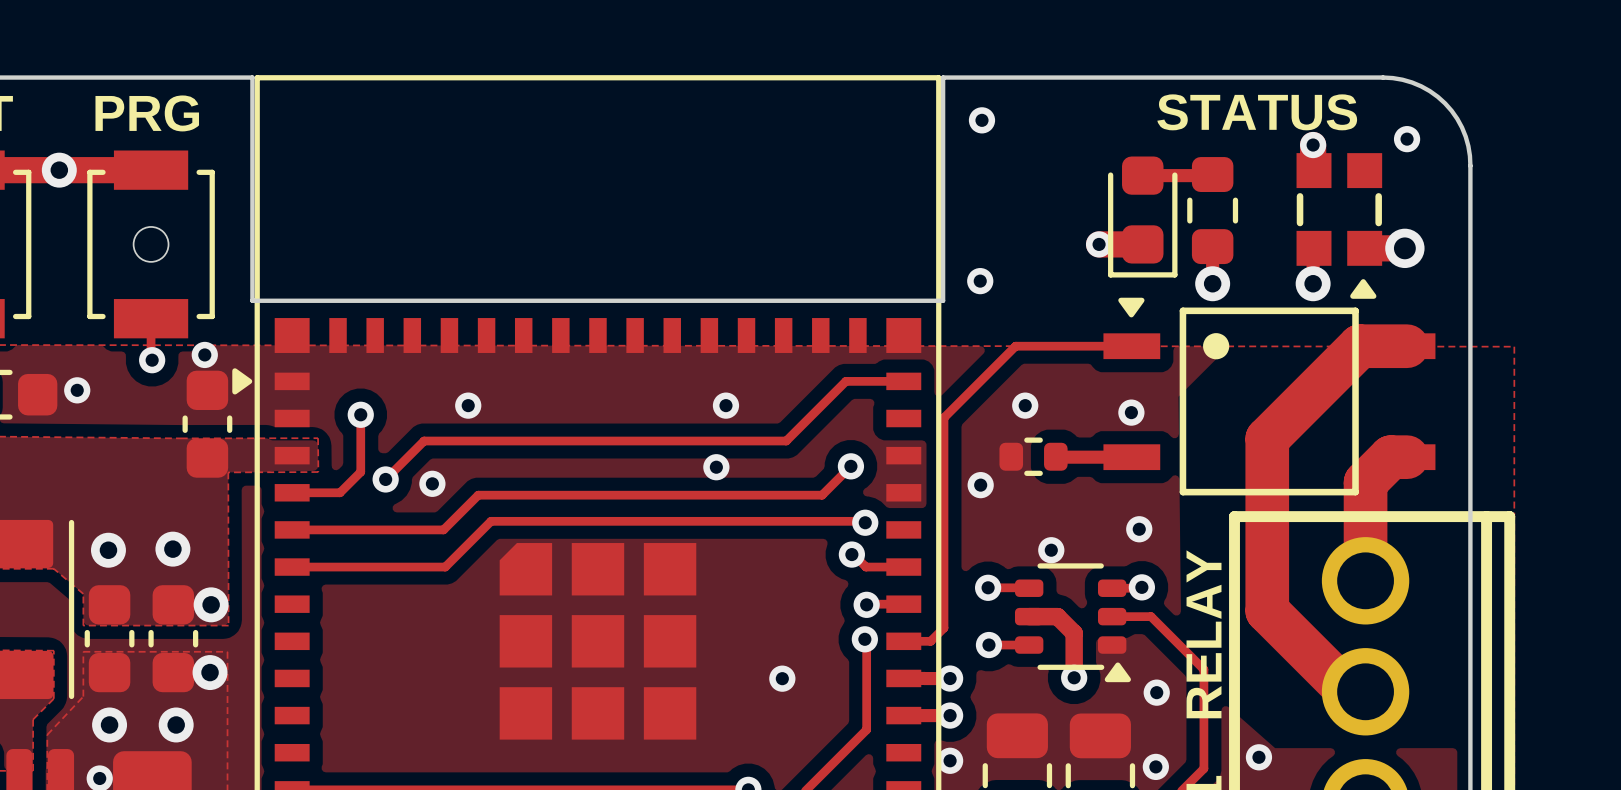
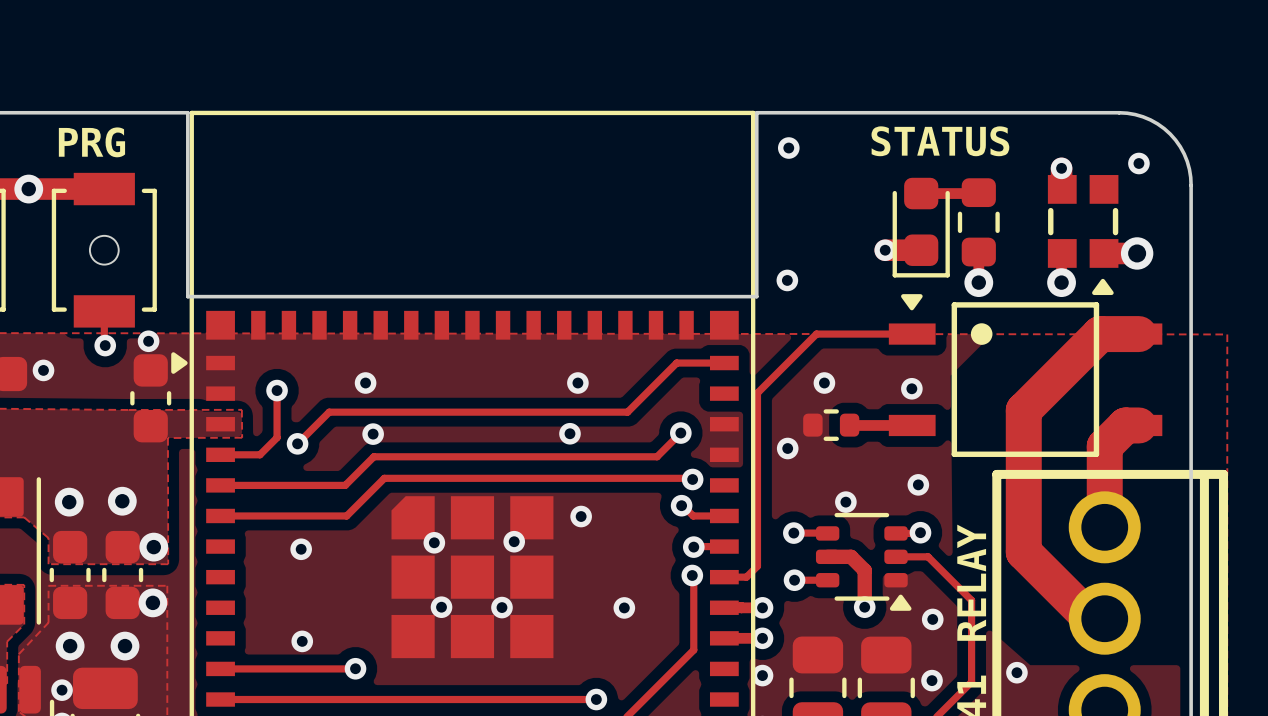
text position: STATUS (1257, 112) -> STATUS (940, 141)
via position: (432, 483) -> (373, 434)
via: none -> (581, 516)
via: none -> (514, 541)
via: none -> (434, 542)
via: none -> (301, 549)
via: none -> (441, 607)
via: none -> (501, 607)
via: none -> (302, 641)
track: none -> (220, 668) (355, 668)
via: none -> (355, 668)

